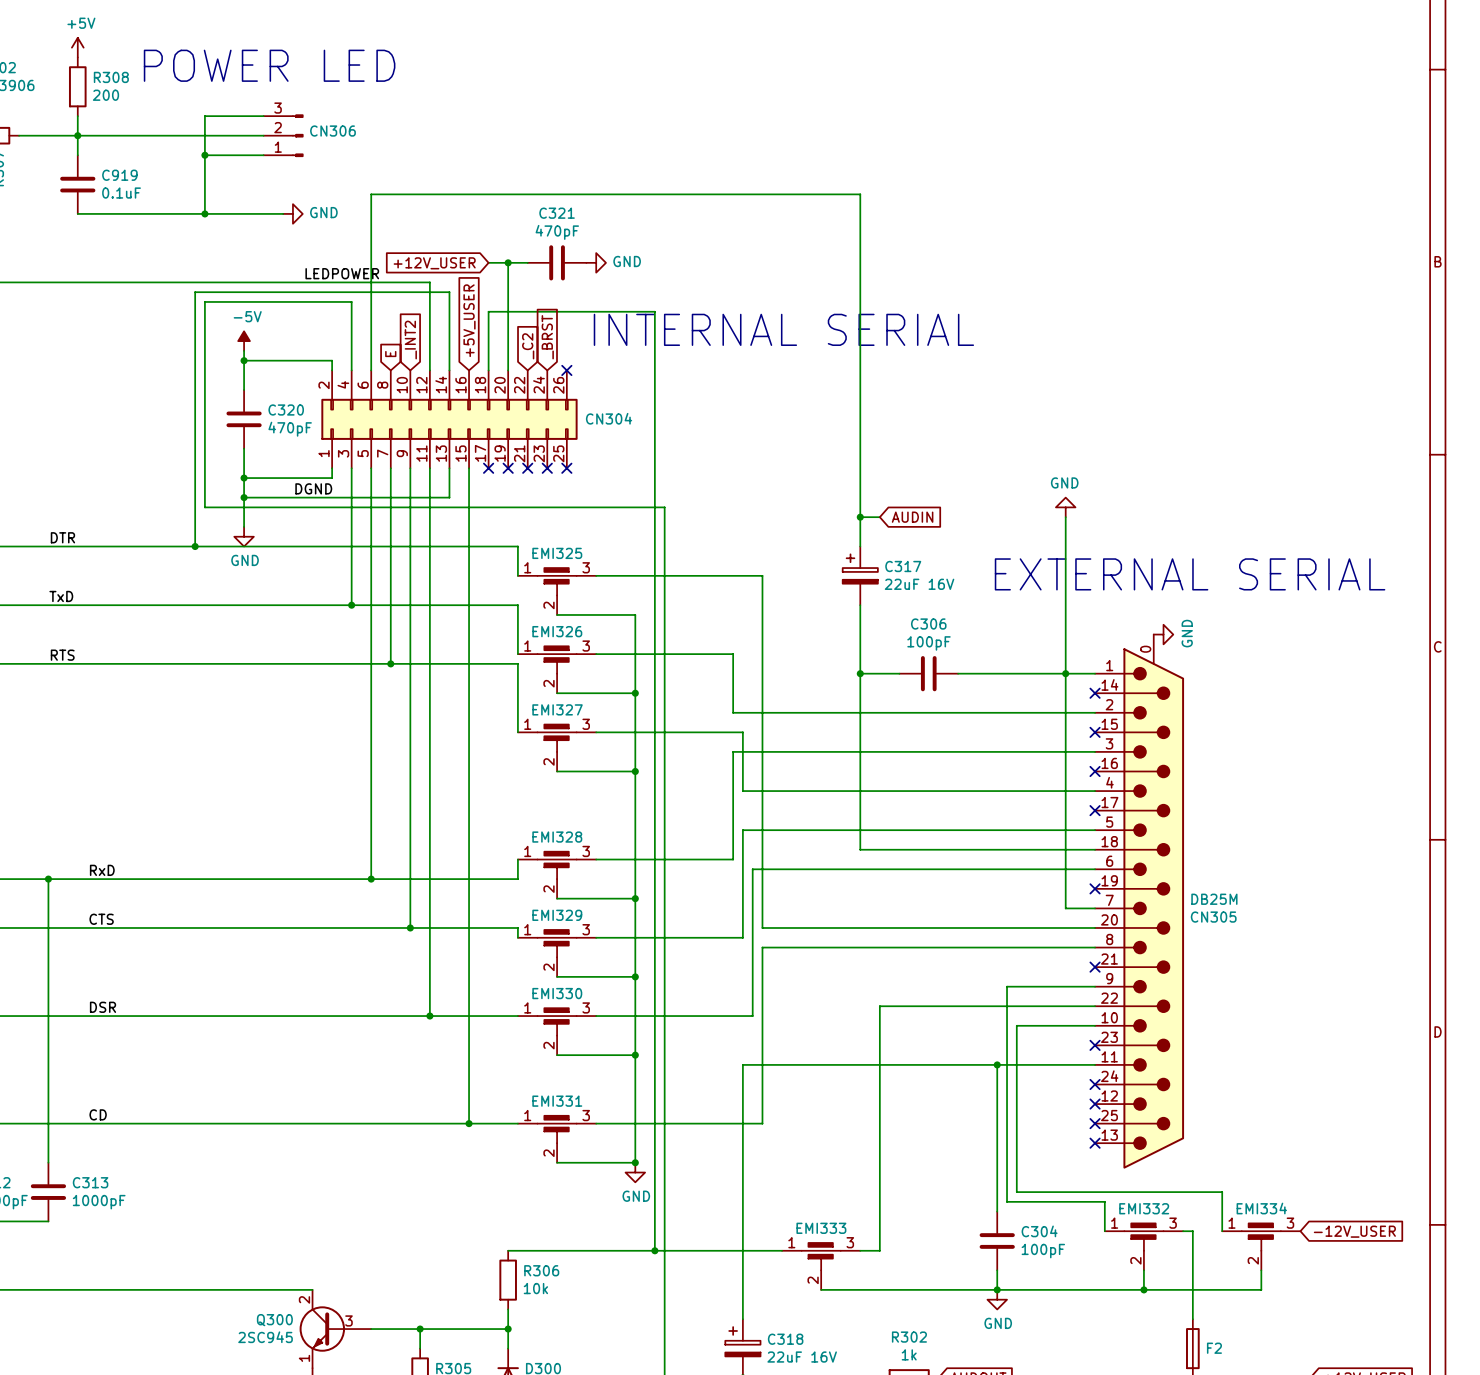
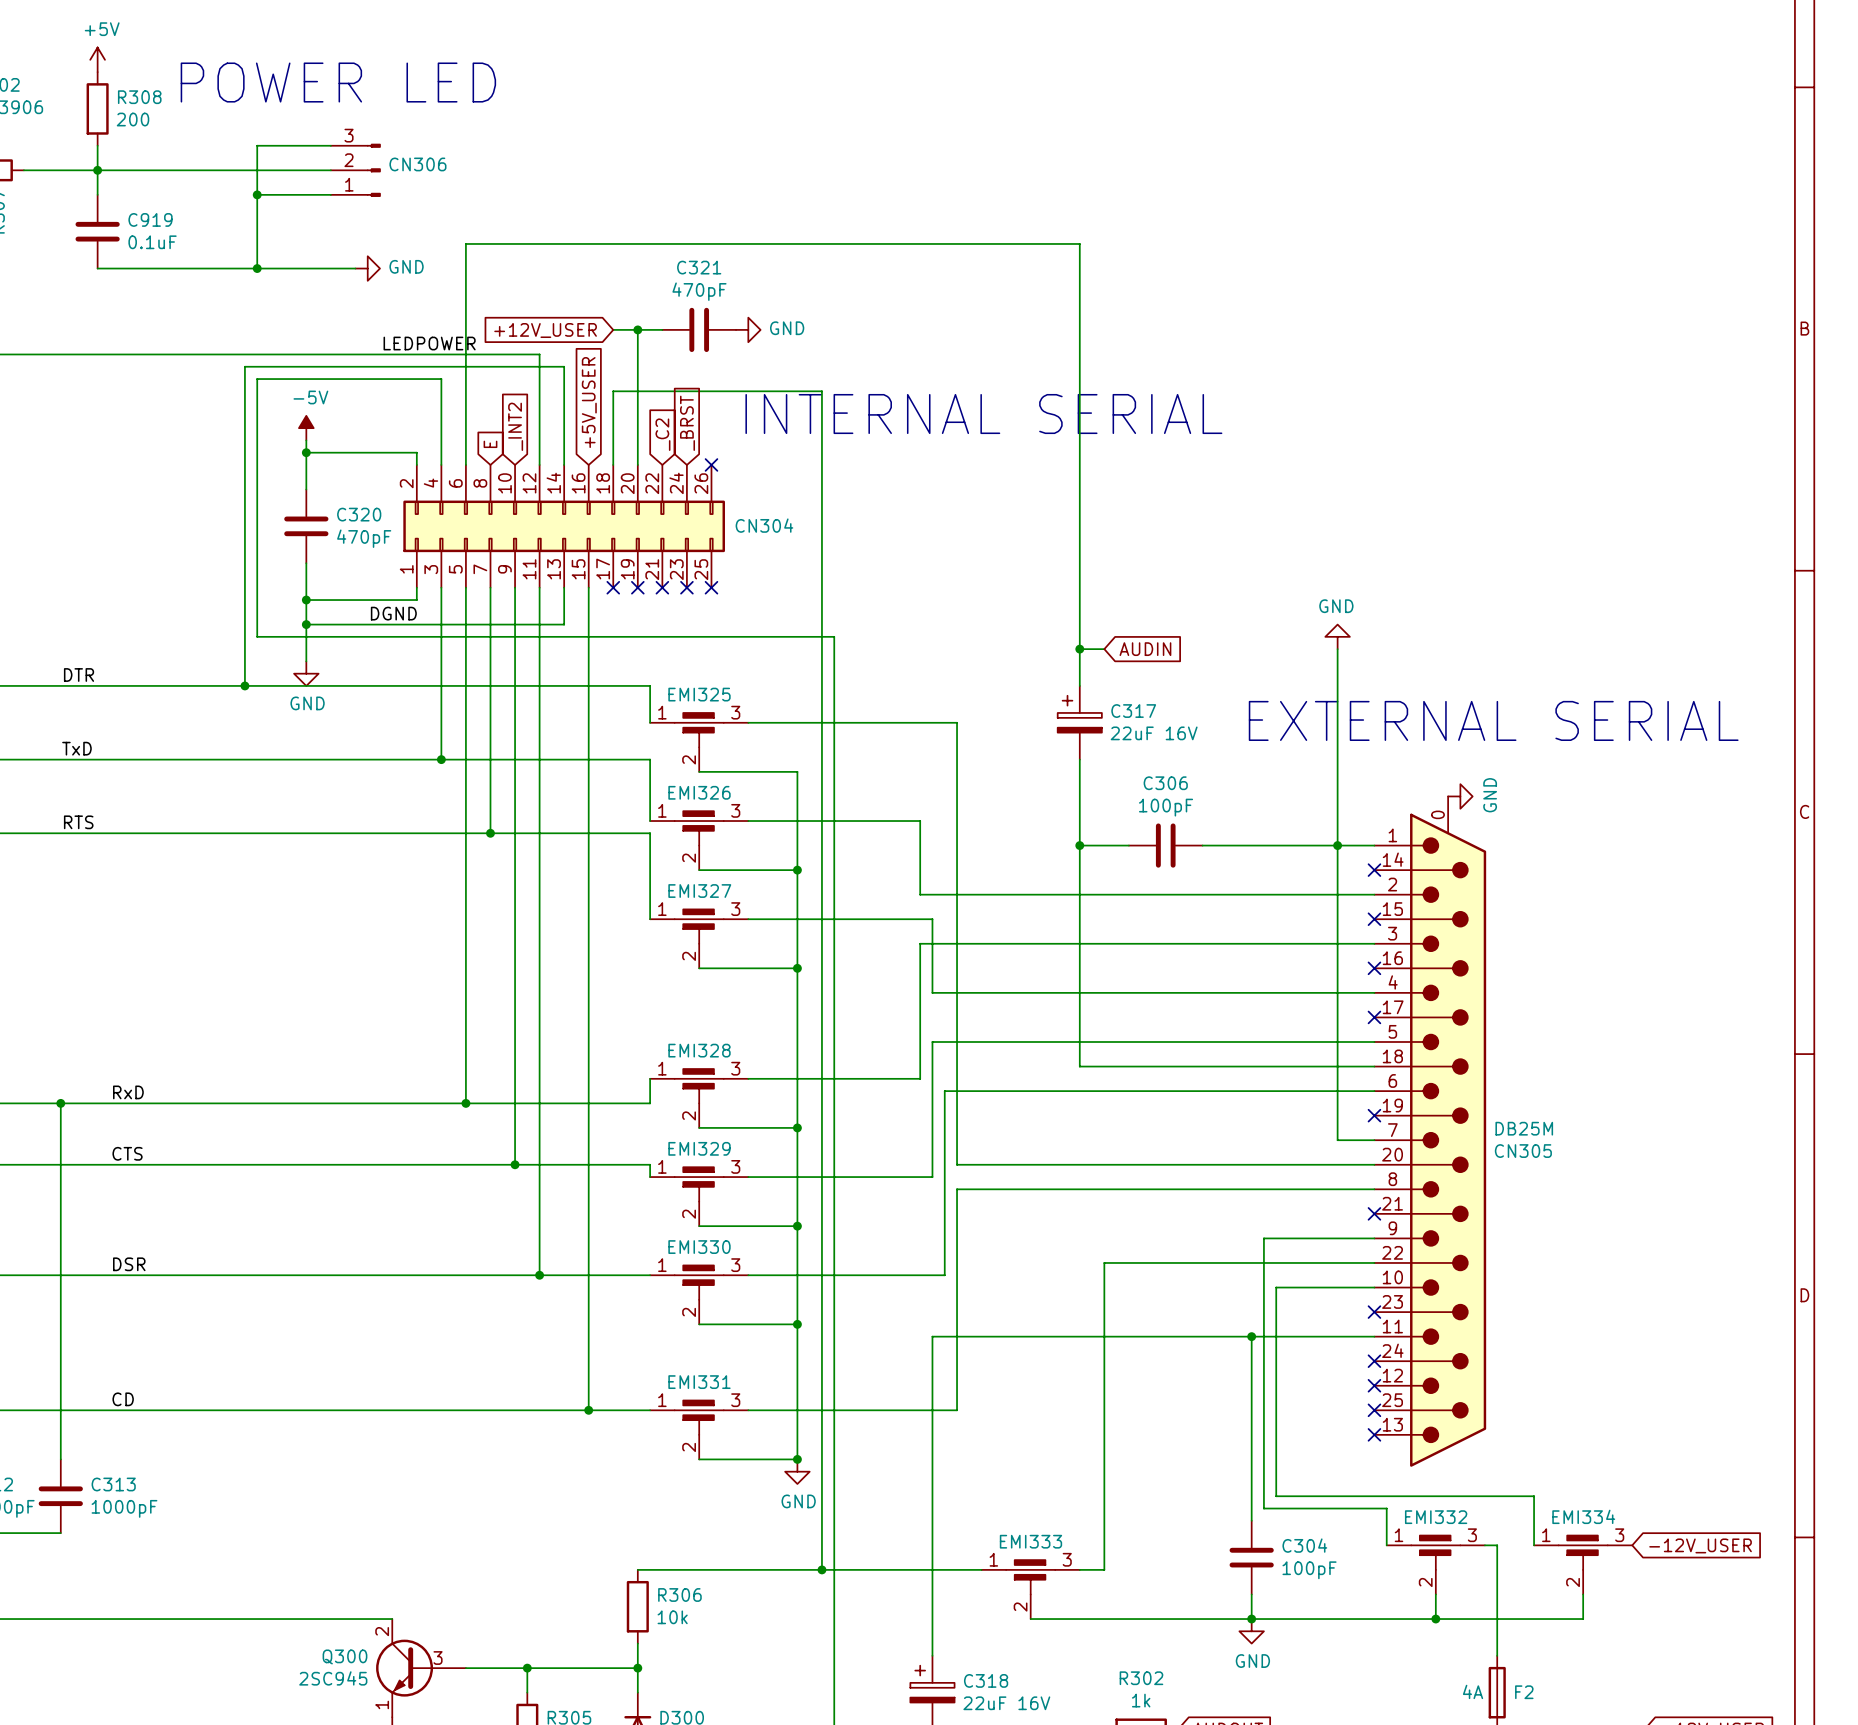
F2 value: none -> 4A (1473, 1691)

